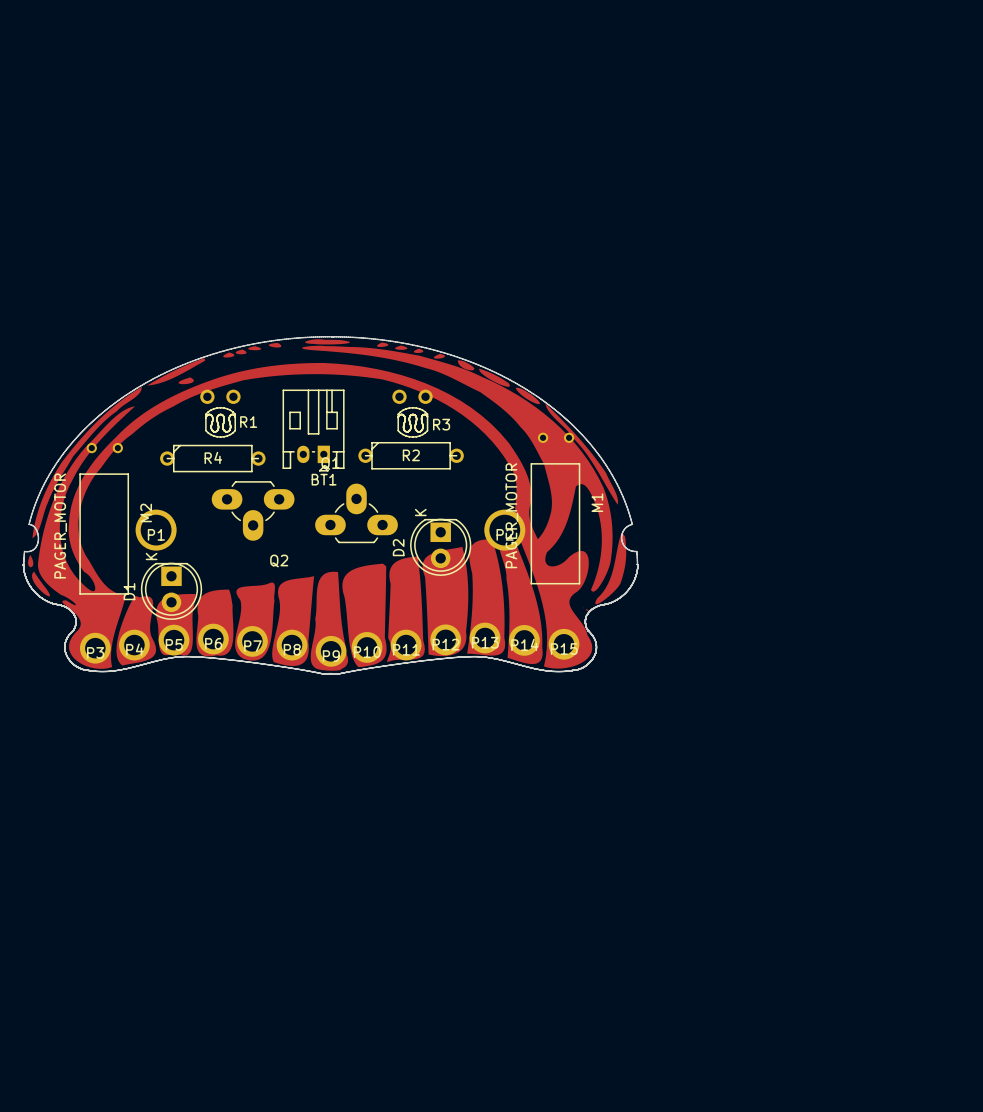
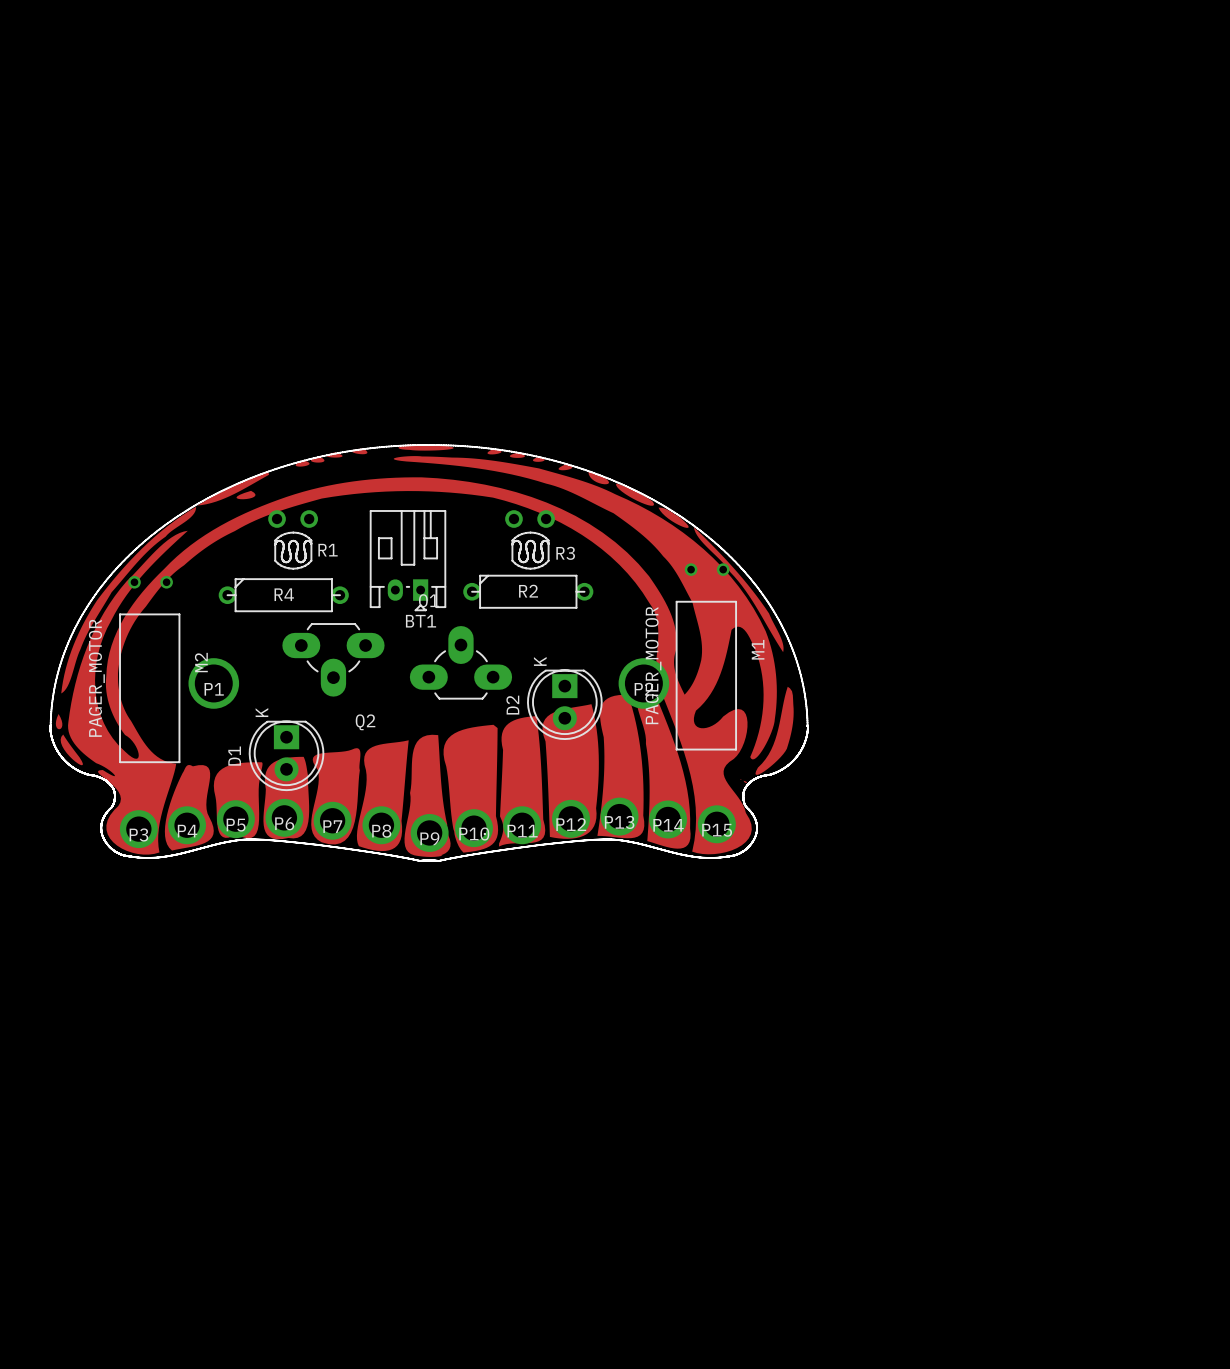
drawing shape: [23, 336, 639, 675] -> [49, 444, 809, 862]
D1 position: (171, 591) -> (286, 755)

